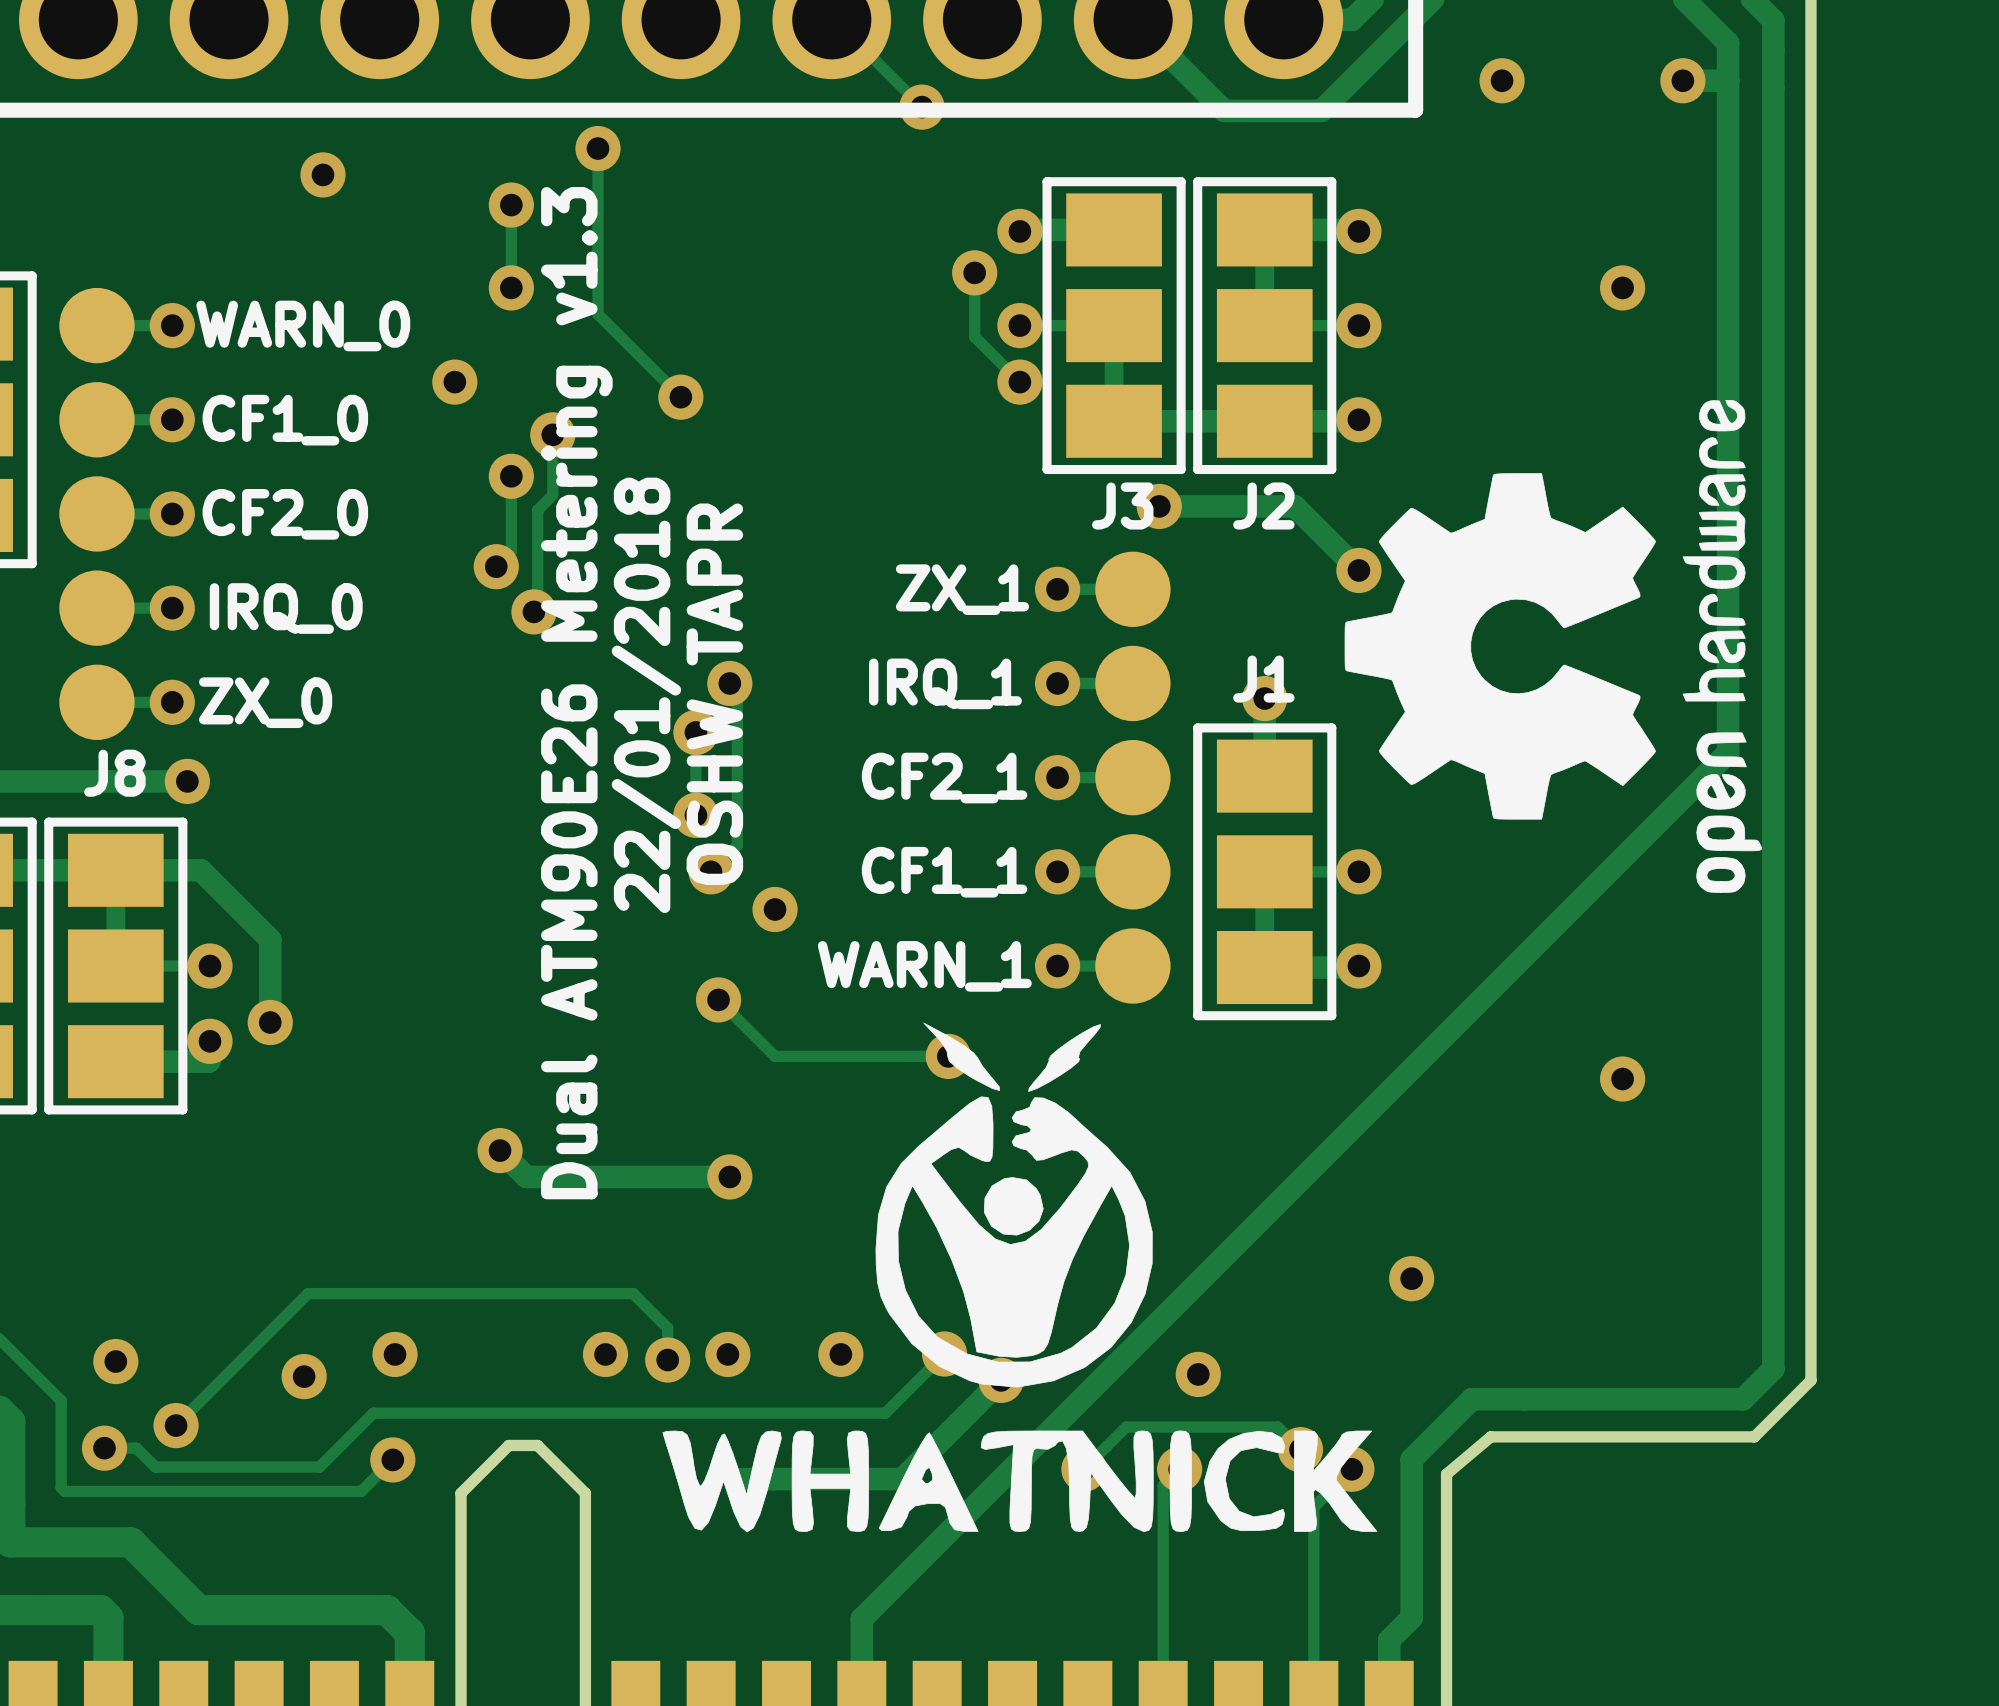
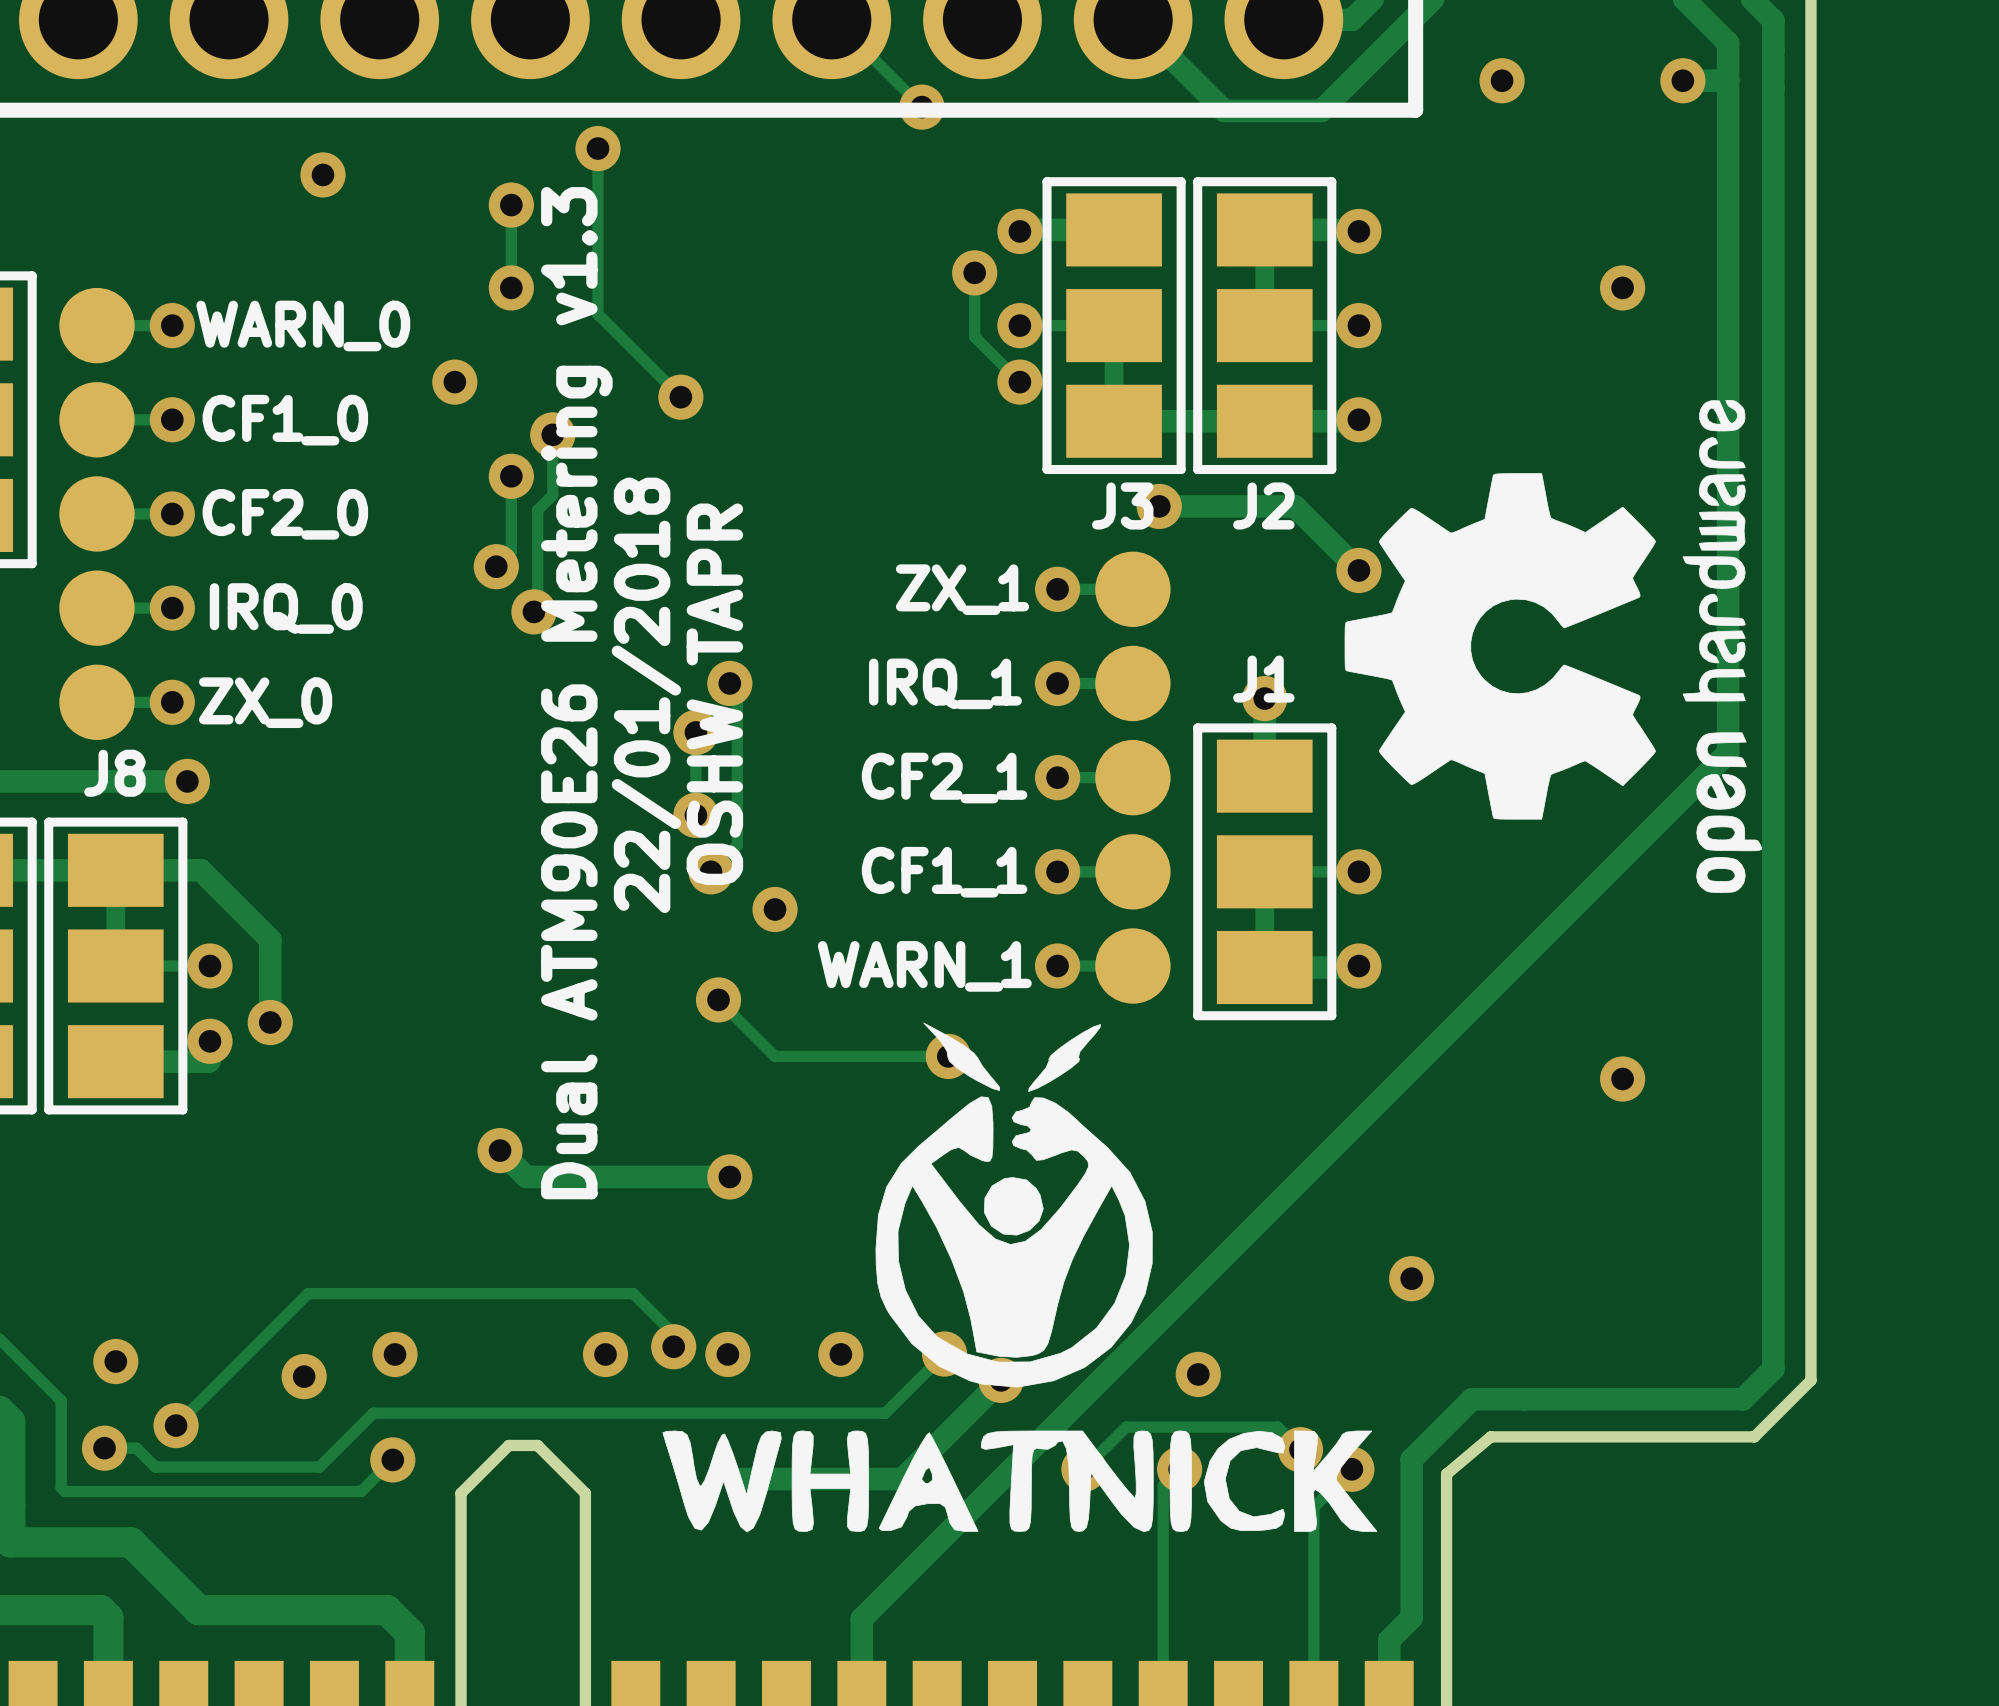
via position: (667, 1360) -> (673, 1346)

